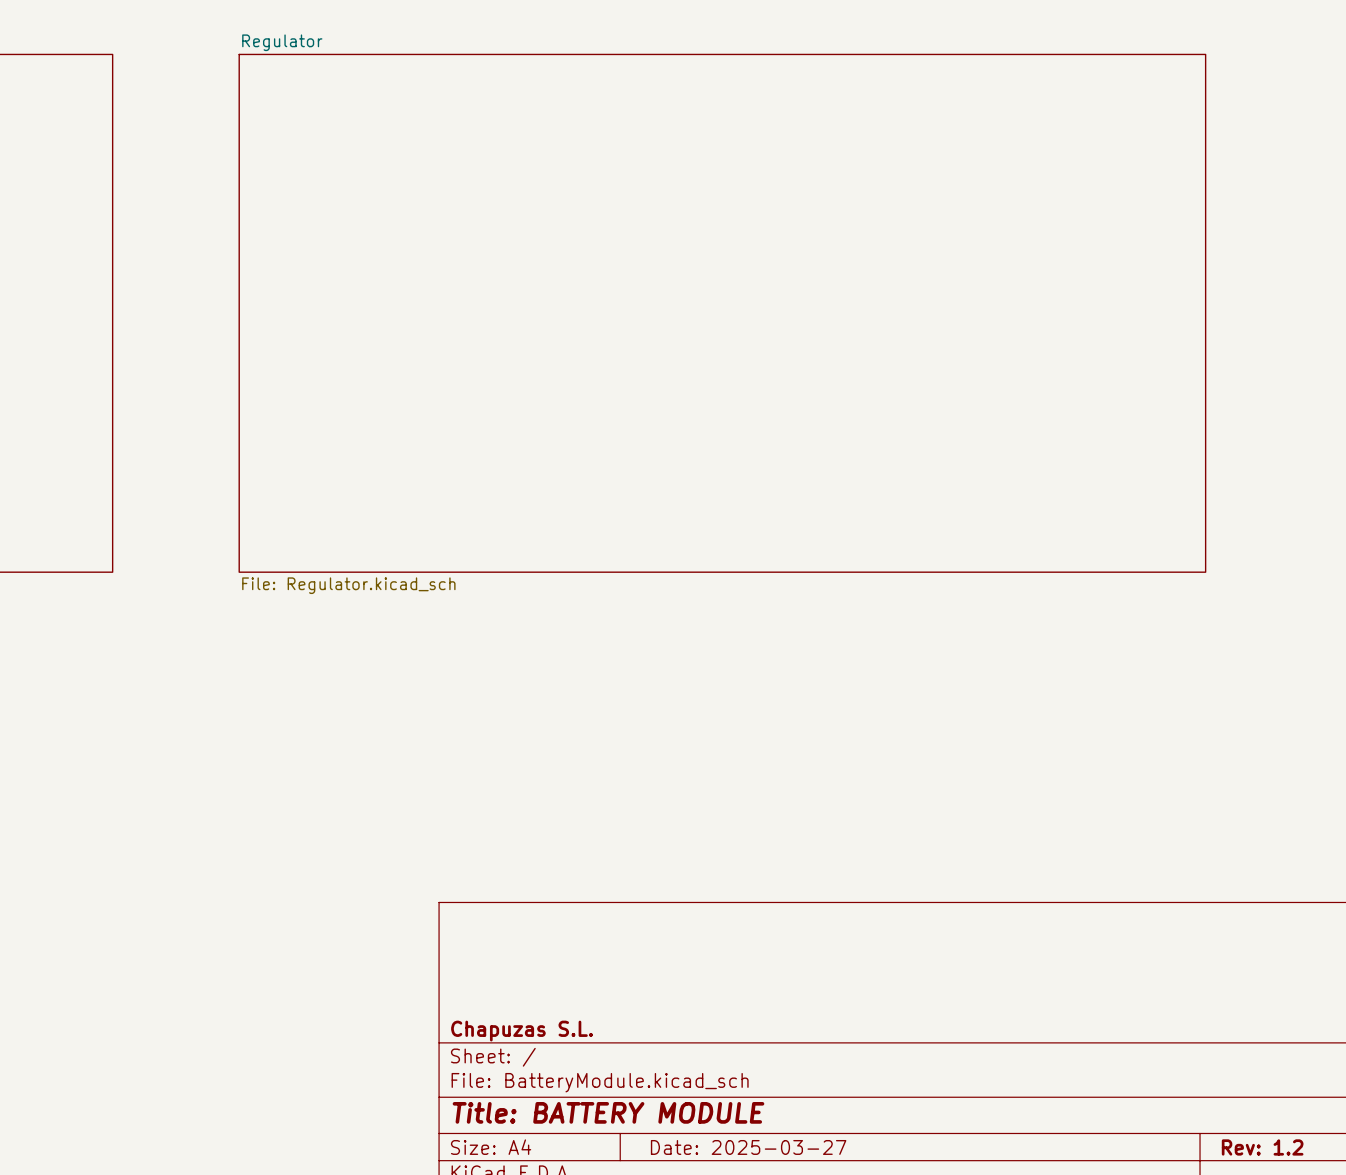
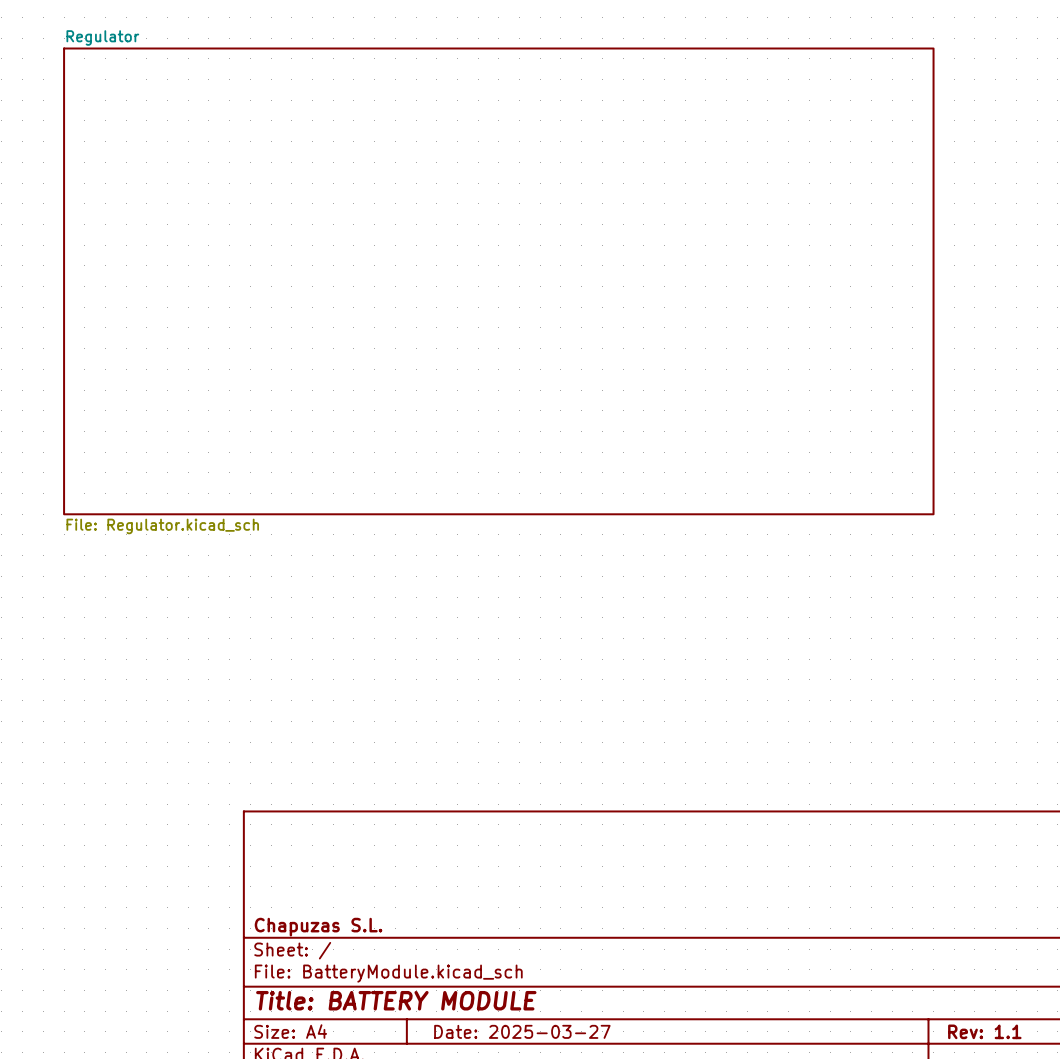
title block: Rev: 1.2 (1262, 1147) -> Rev: 1.1 (984, 1031)

